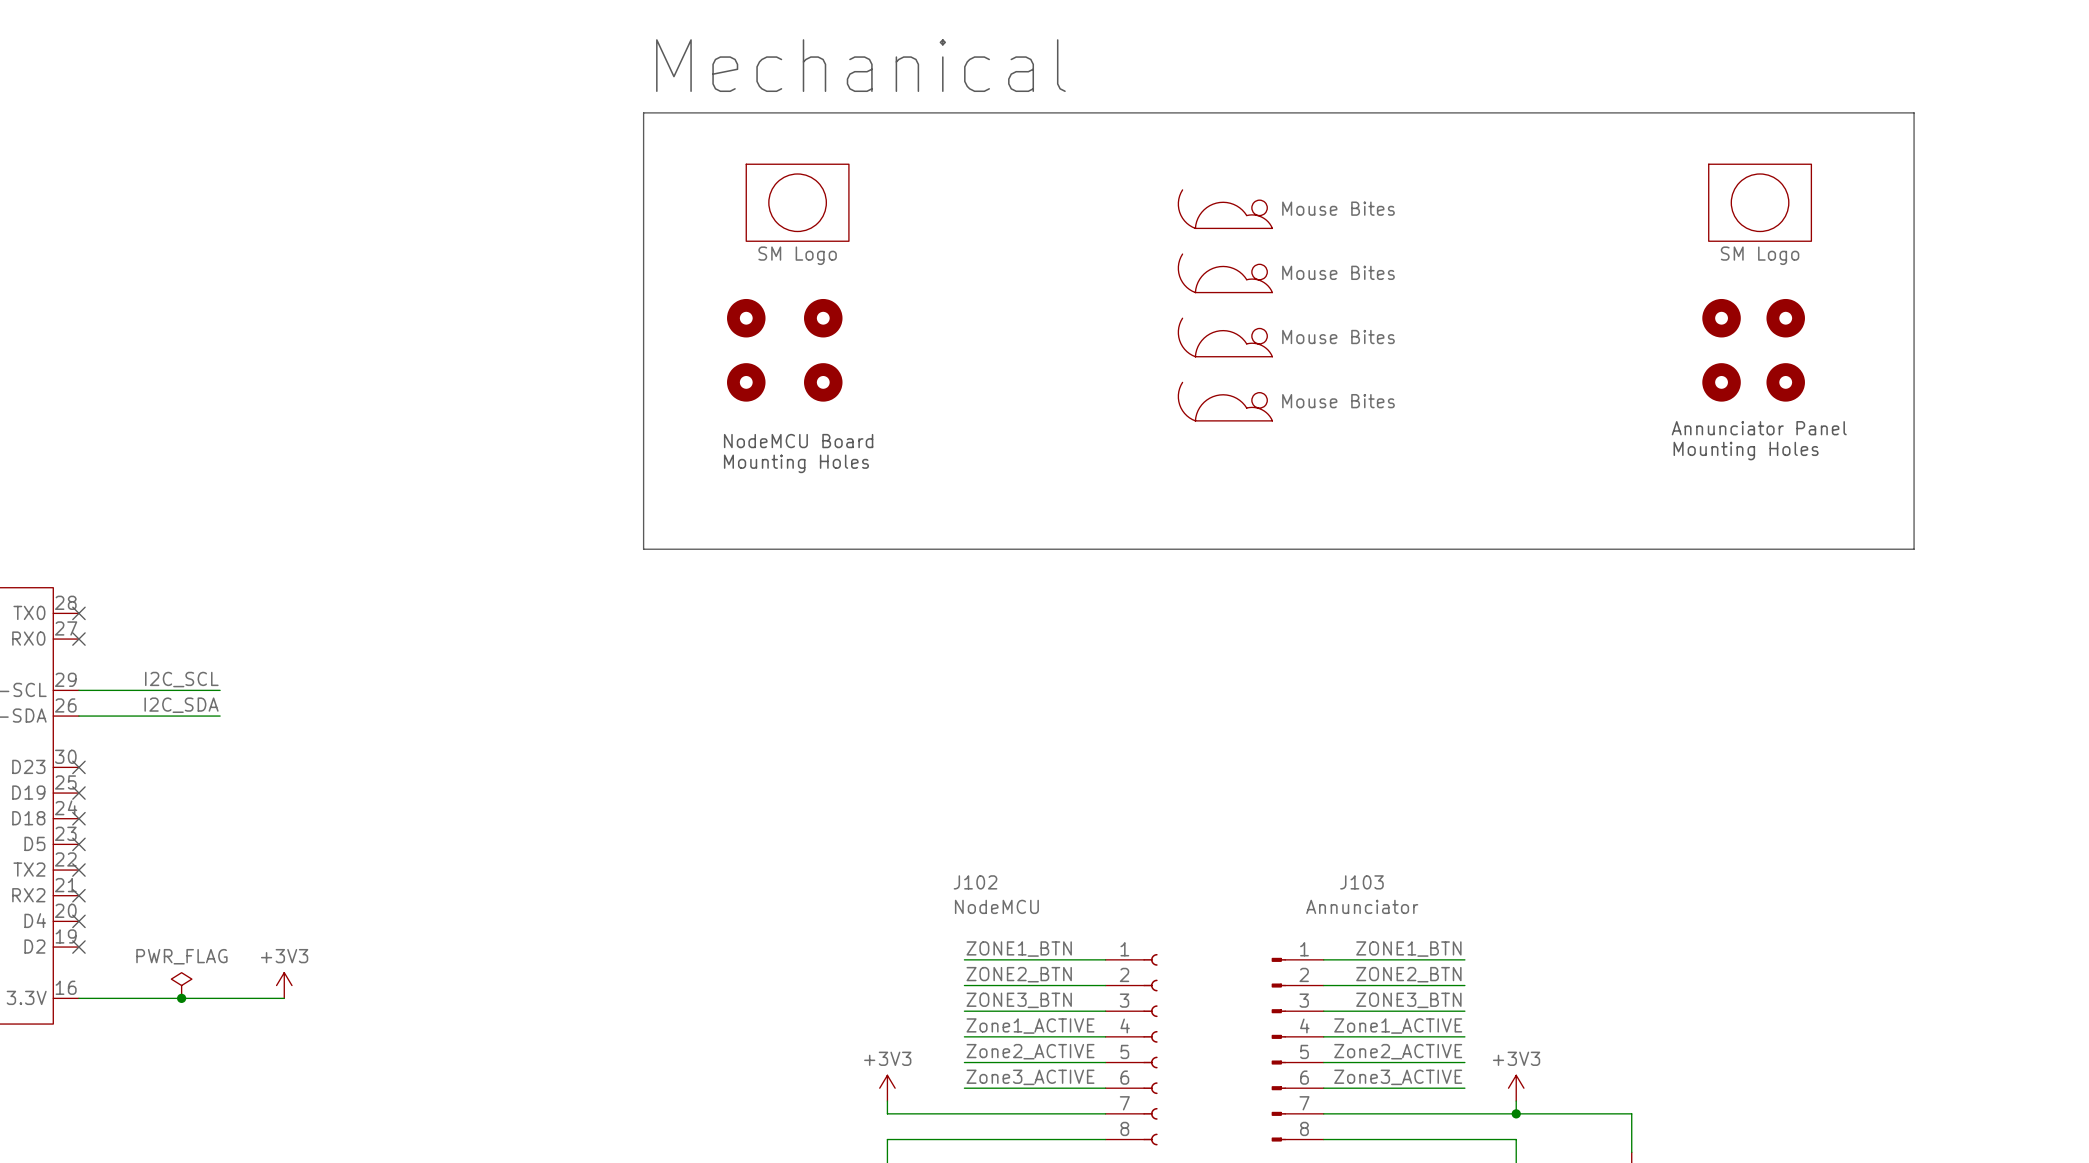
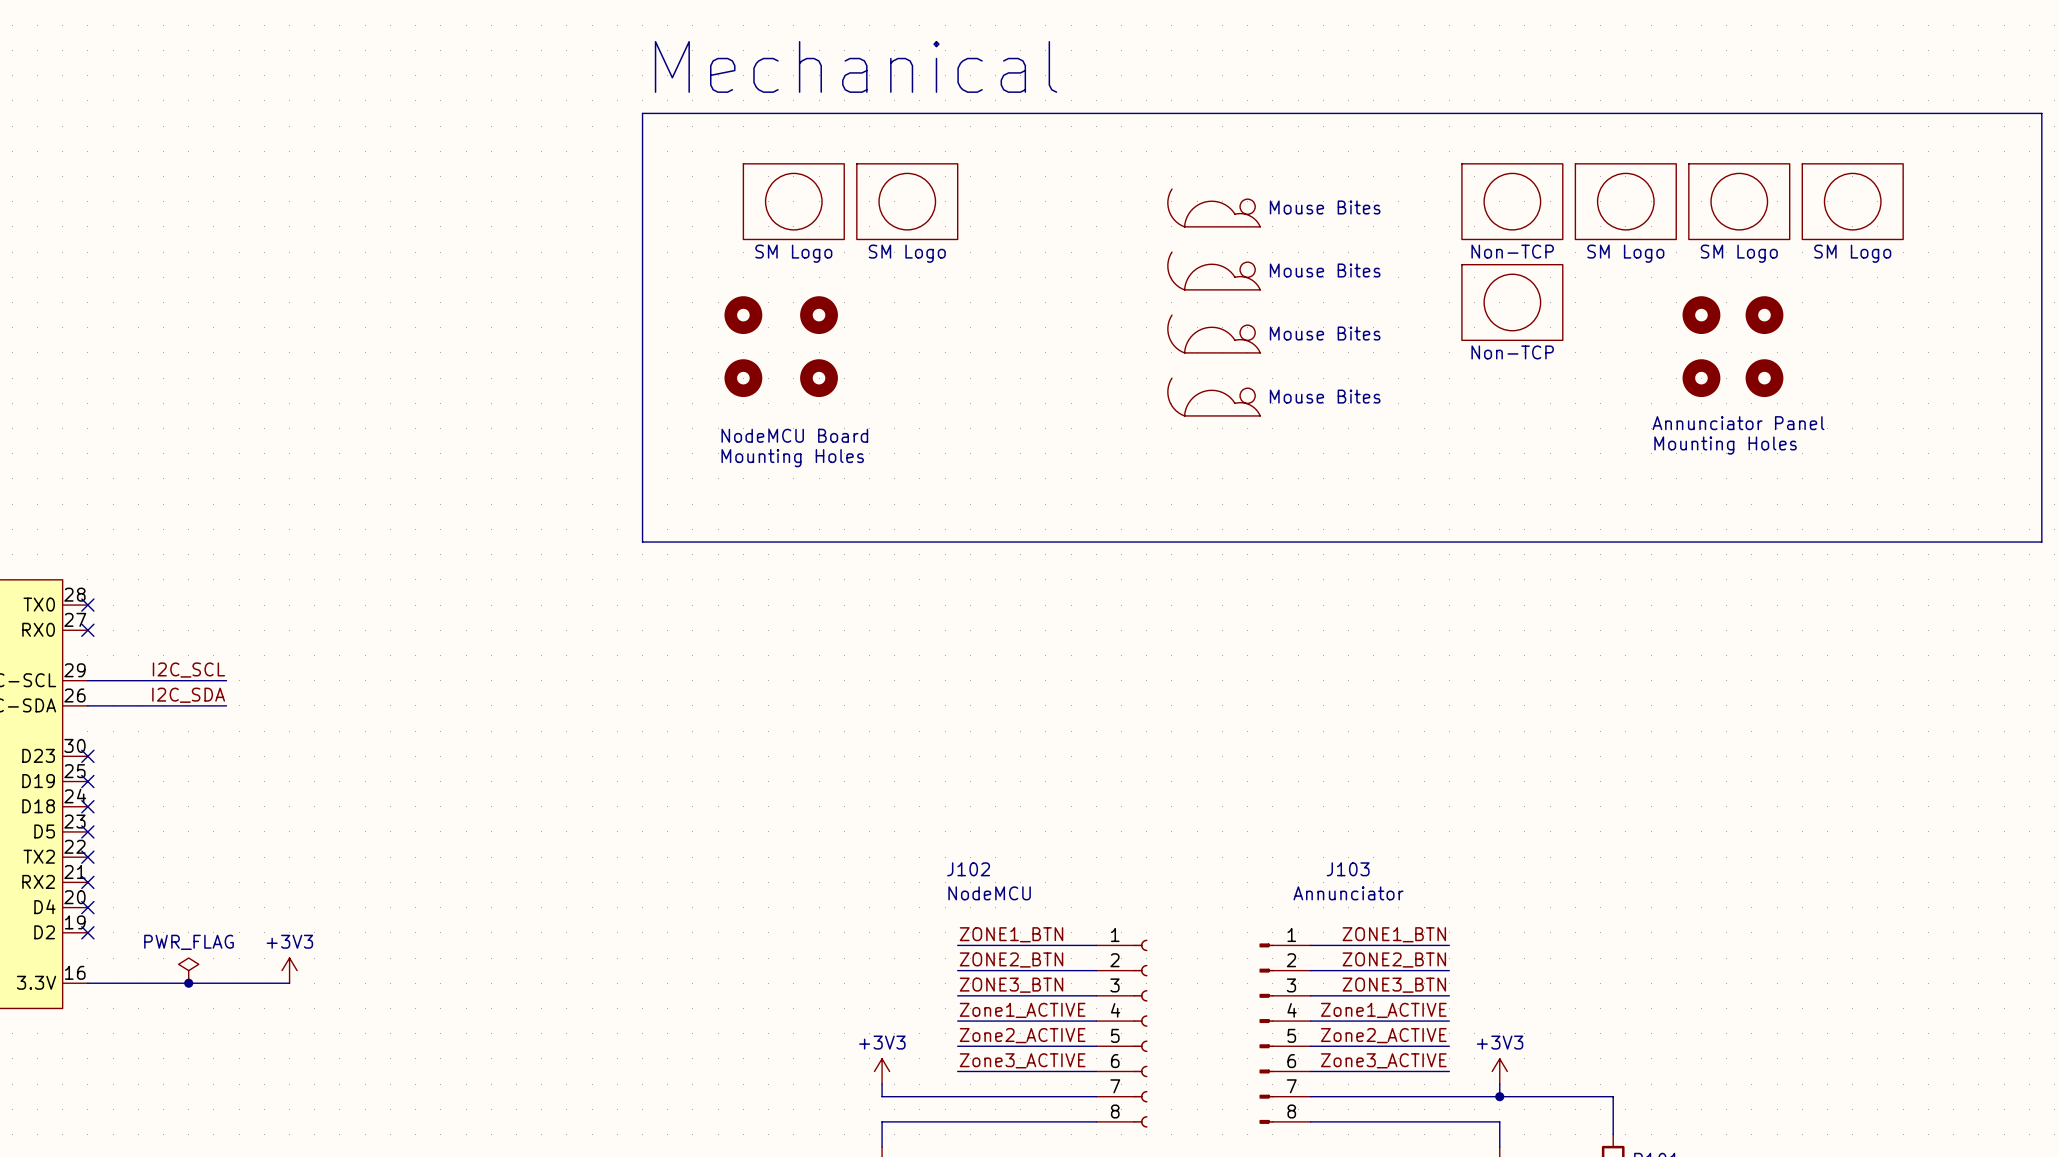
line: (1914, 112) (1914, 549) -> (1890, 113) (2041, 113) (2041, 542) (1890, 542)
part: none -> SM Logo (907, 201)
part: none -> Non-TCP (1512, 201)
part: none -> SM Logo (1625, 201)
part: none -> SM Logo (1852, 201)
part: none -> Non-TCP (1512, 302)

